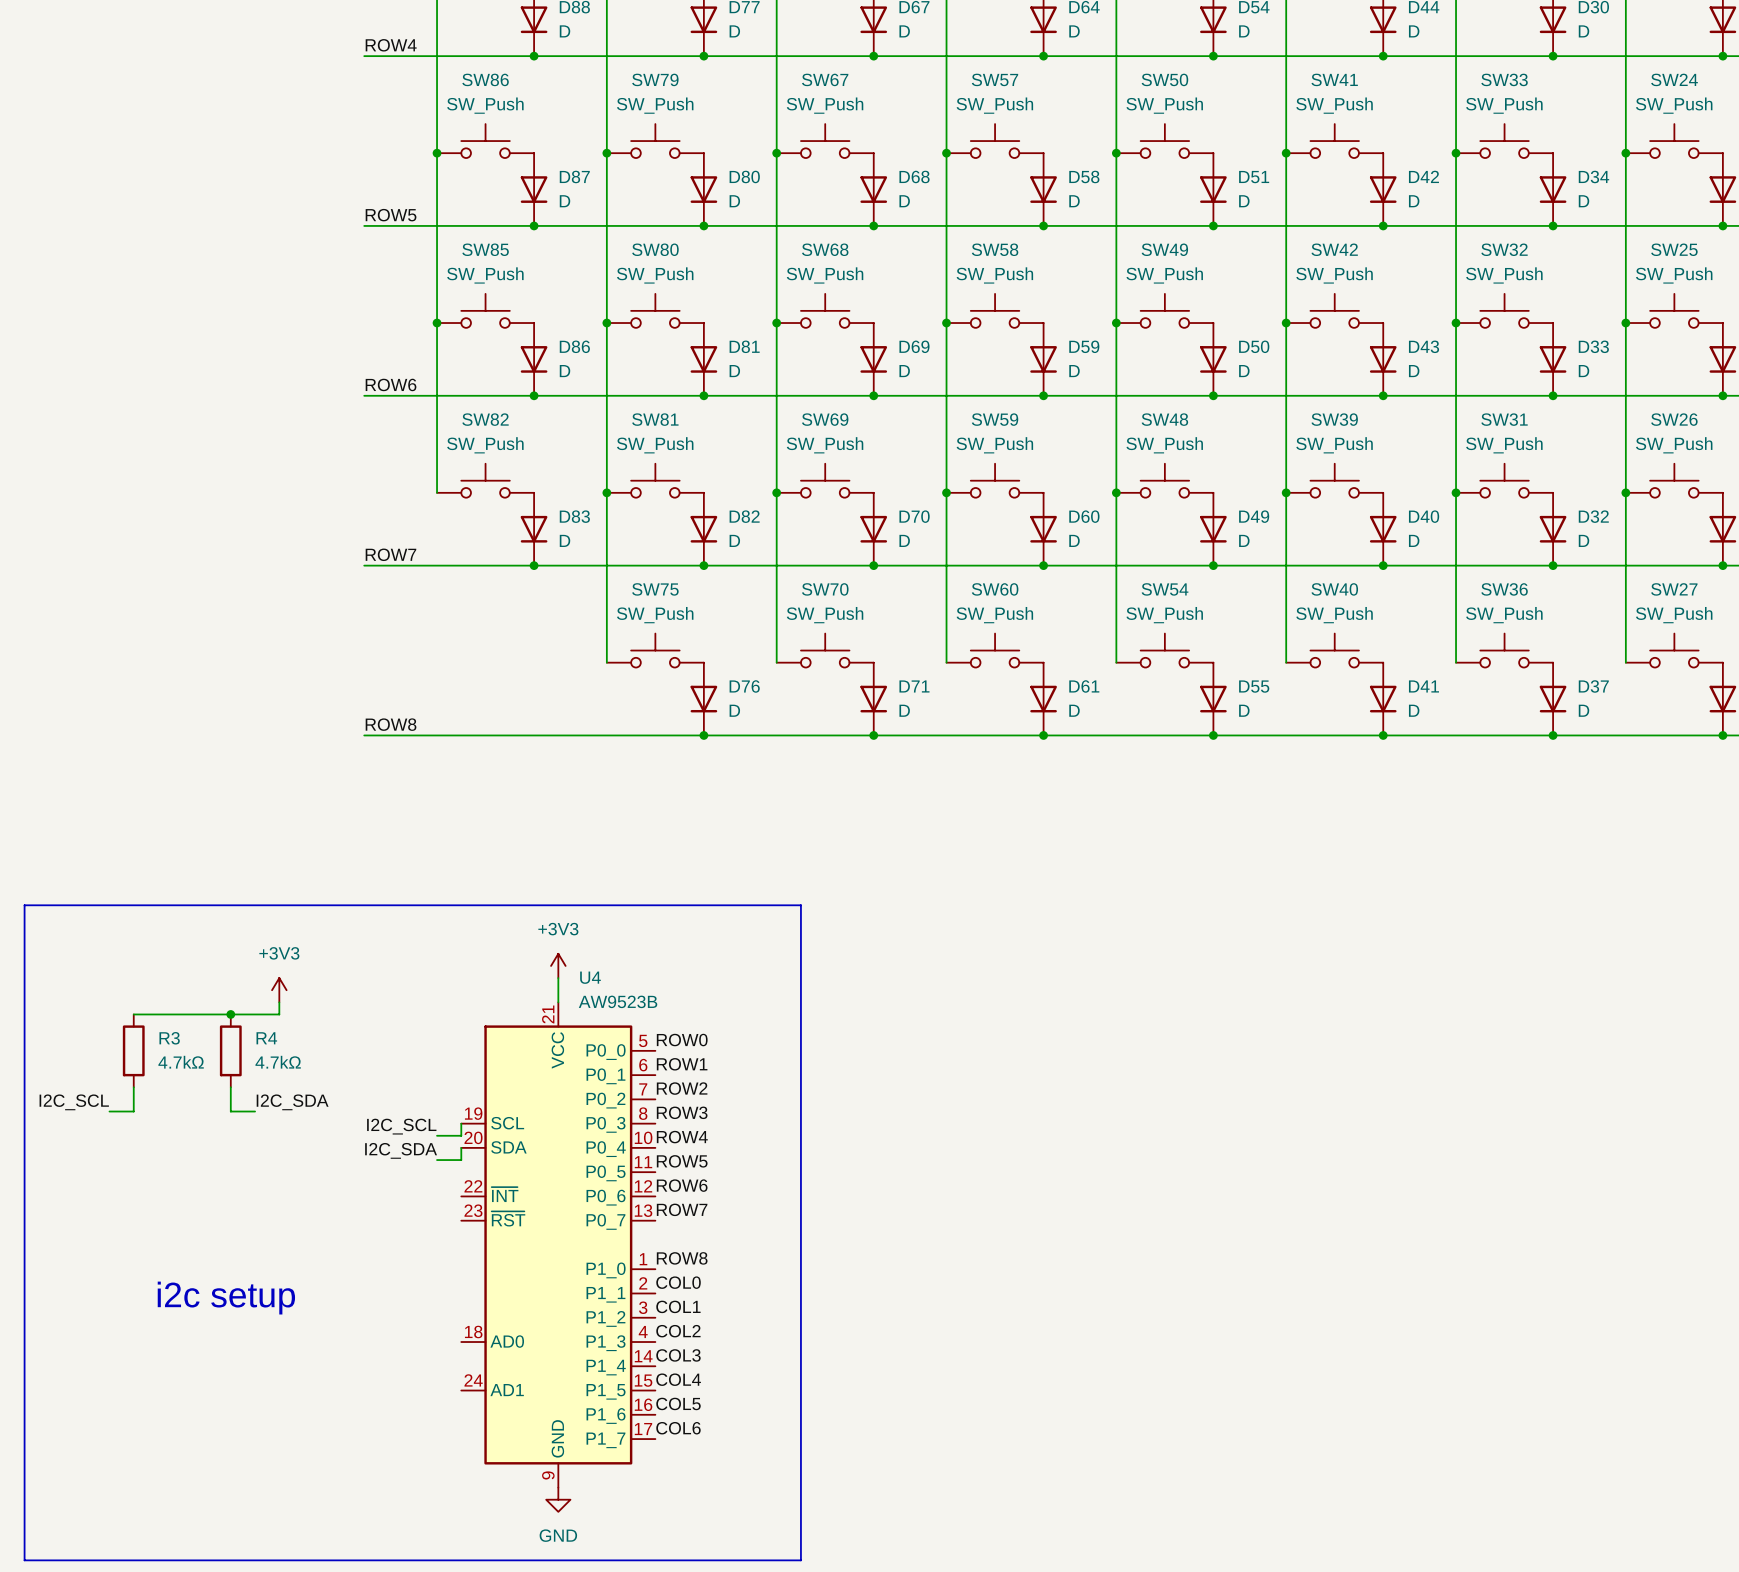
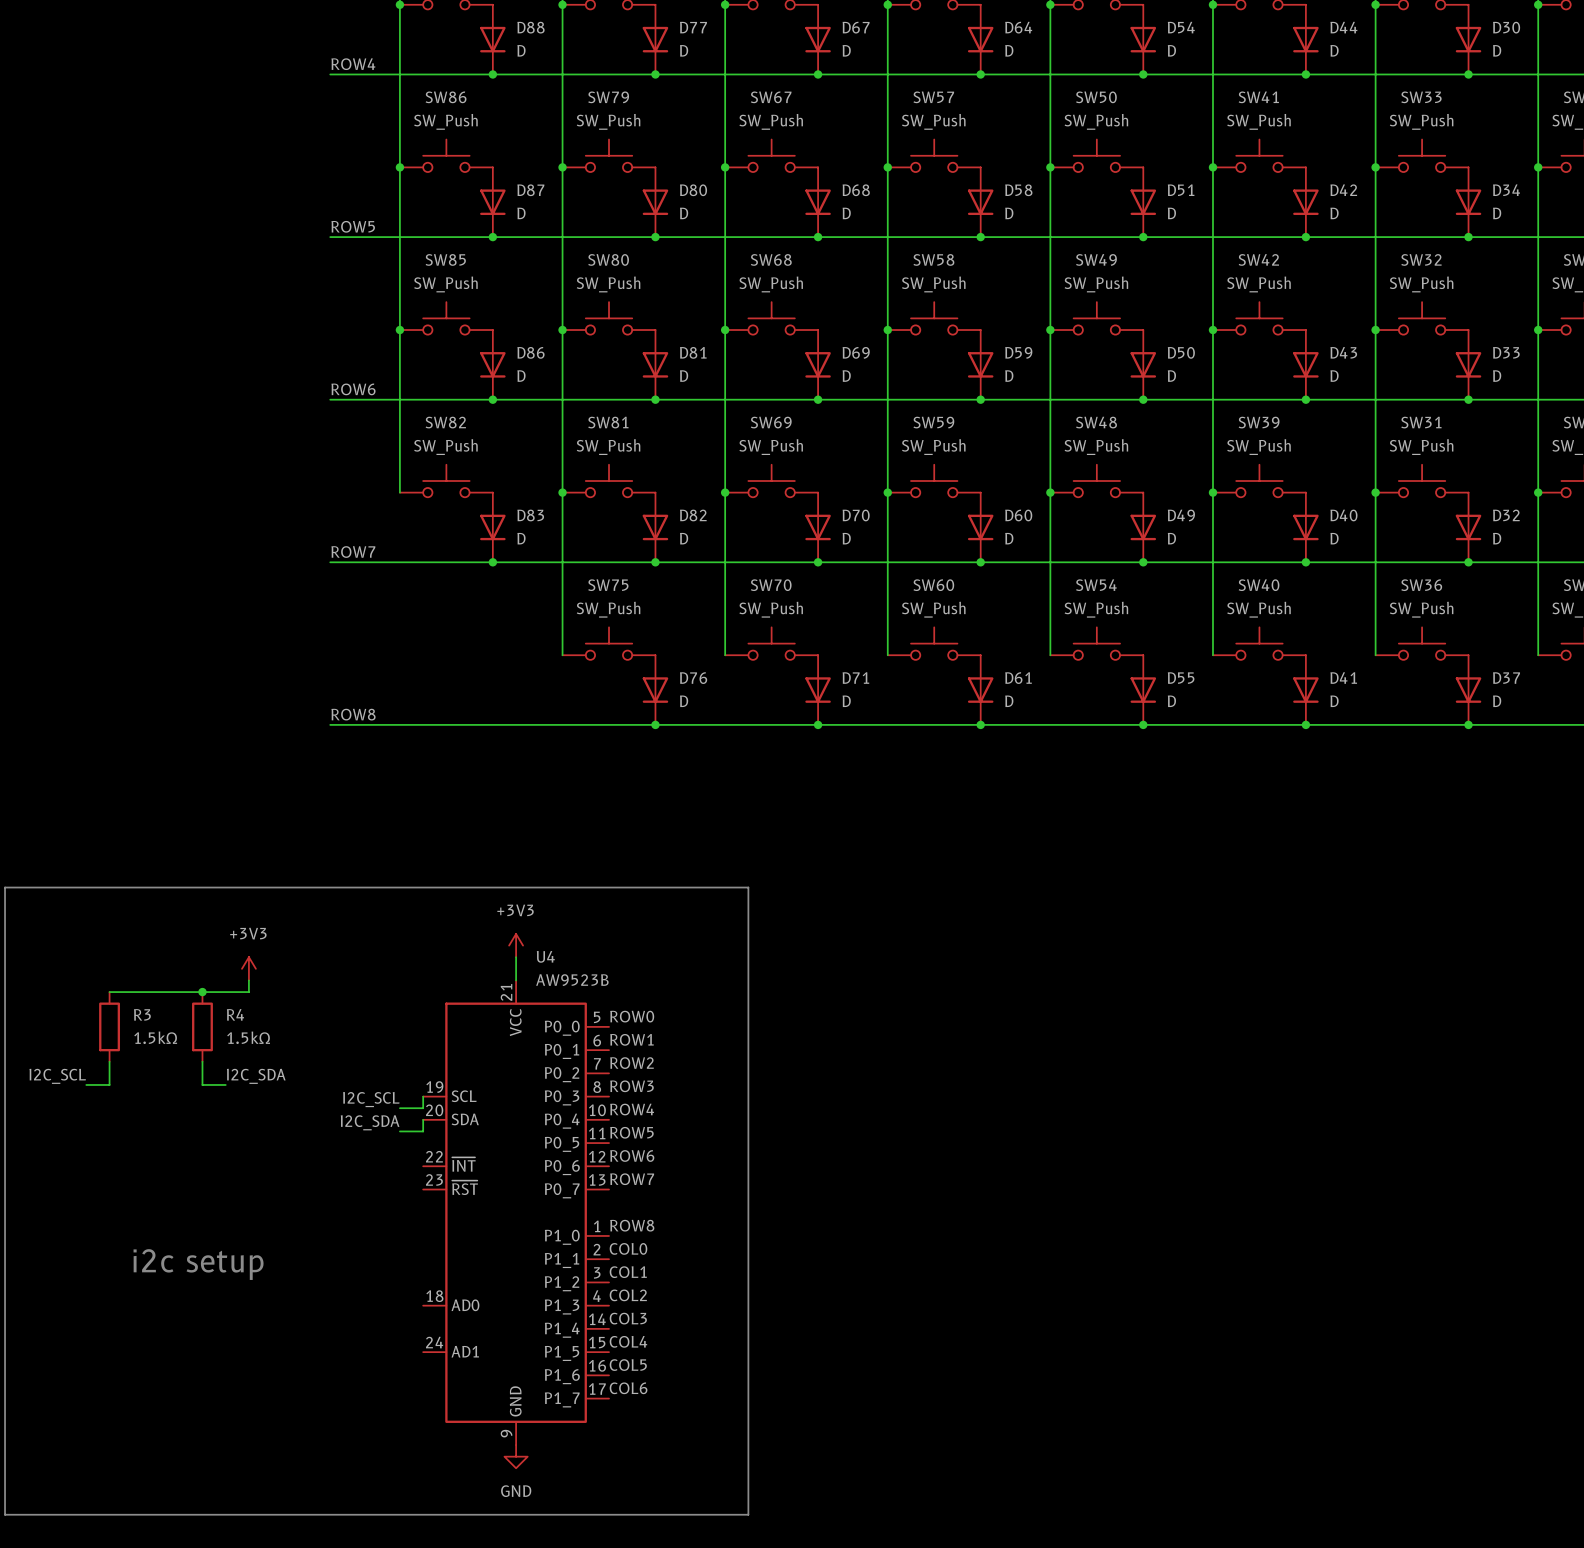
R3 value: 4.7kΩ (181, 1062) -> 1.5kΩ (155, 1037)
R4 value: 4.7kΩ (278, 1062) -> 1.5kΩ (248, 1037)

